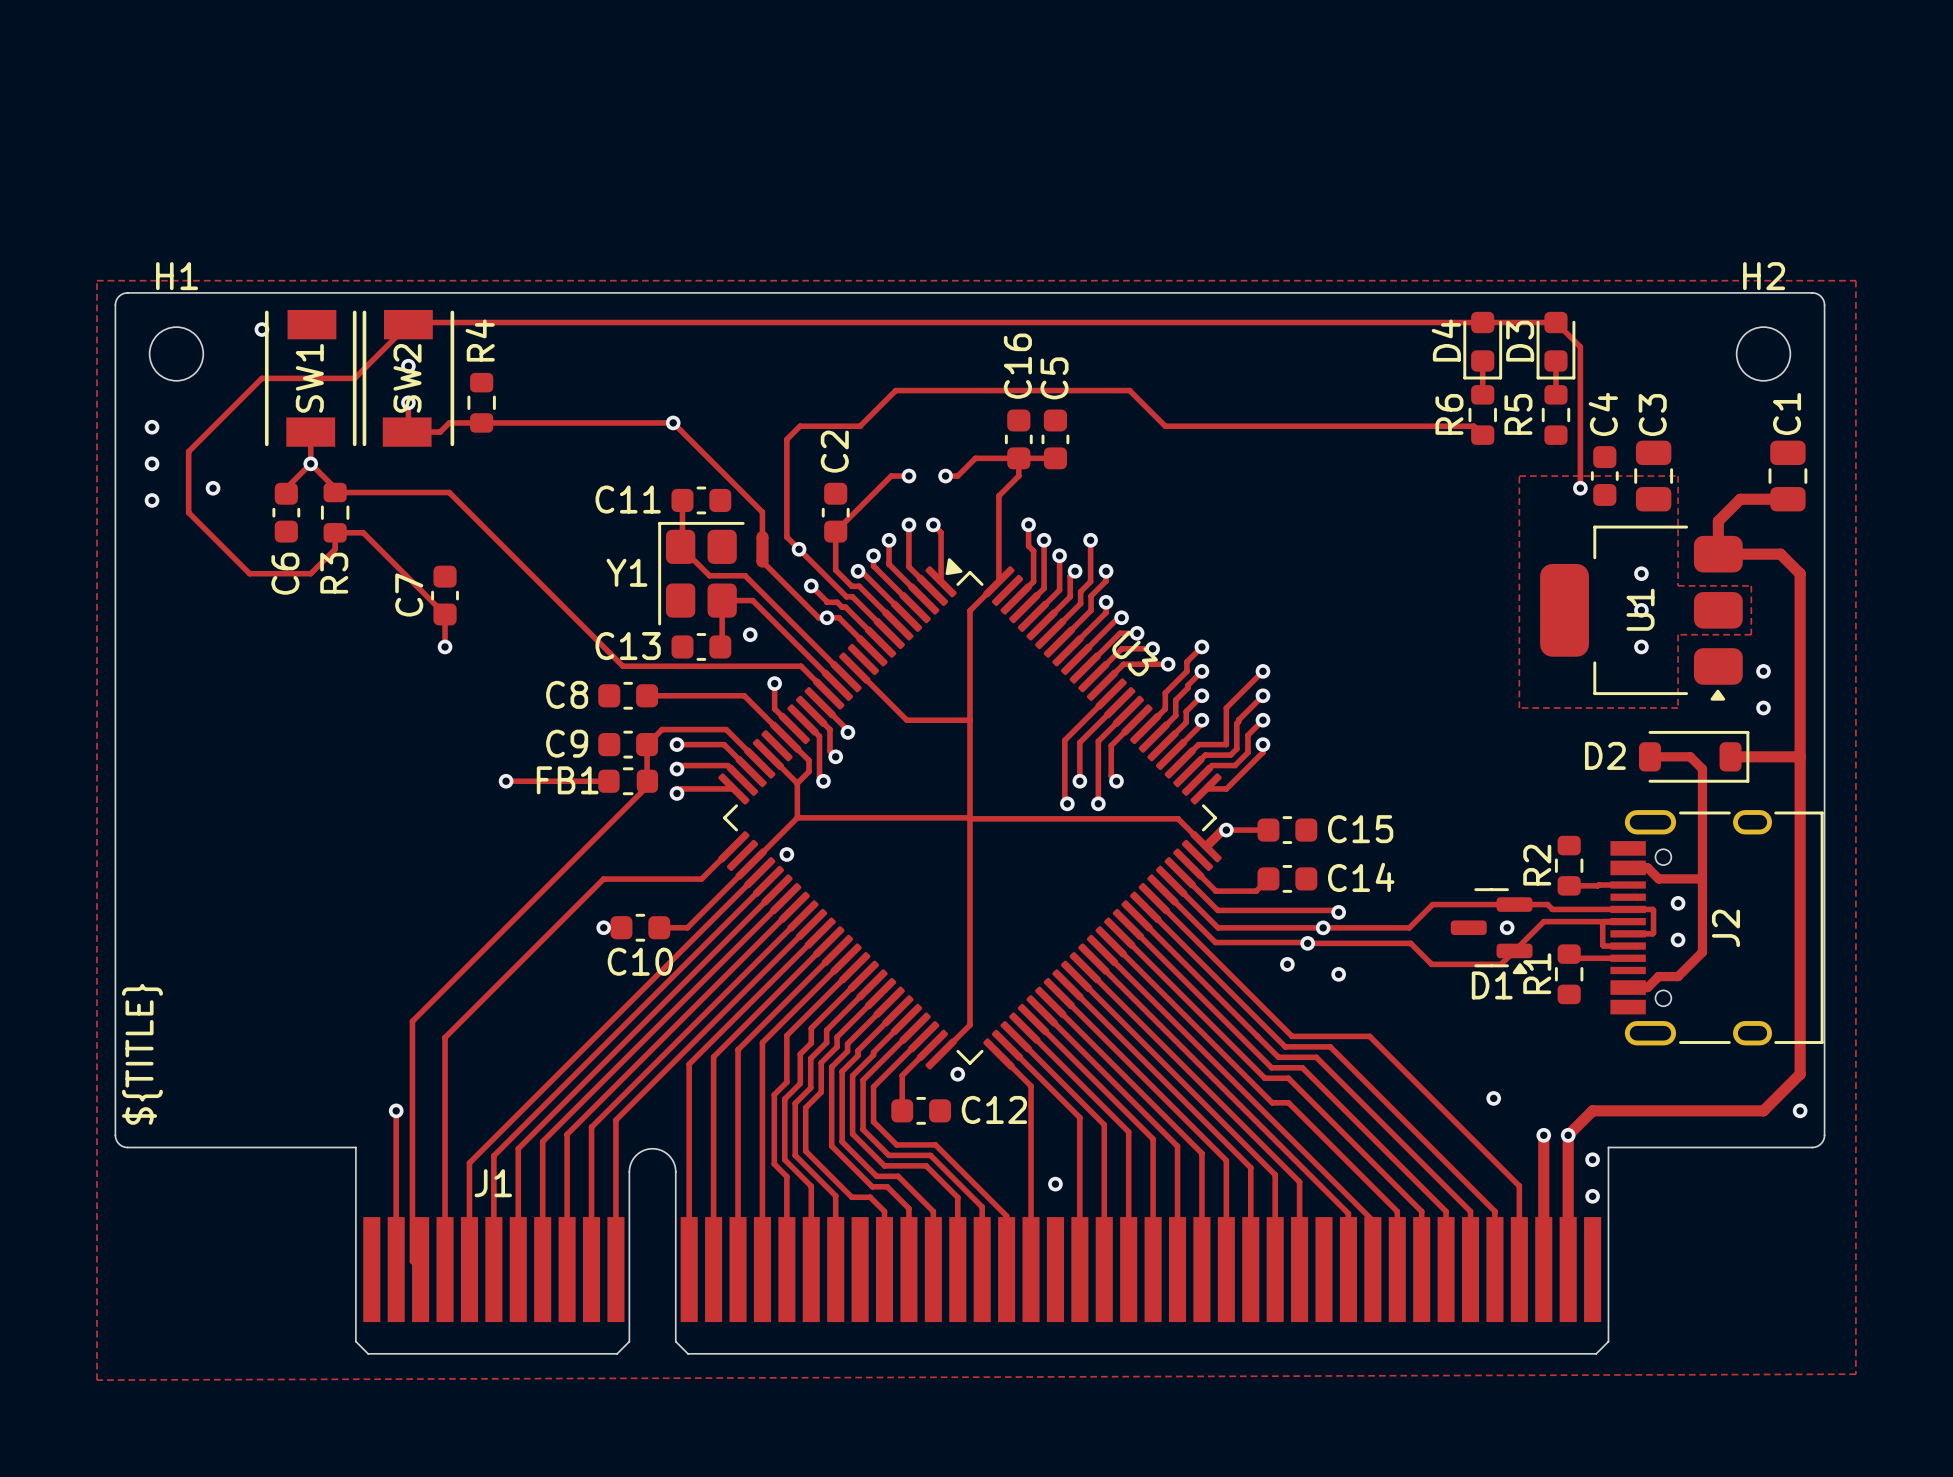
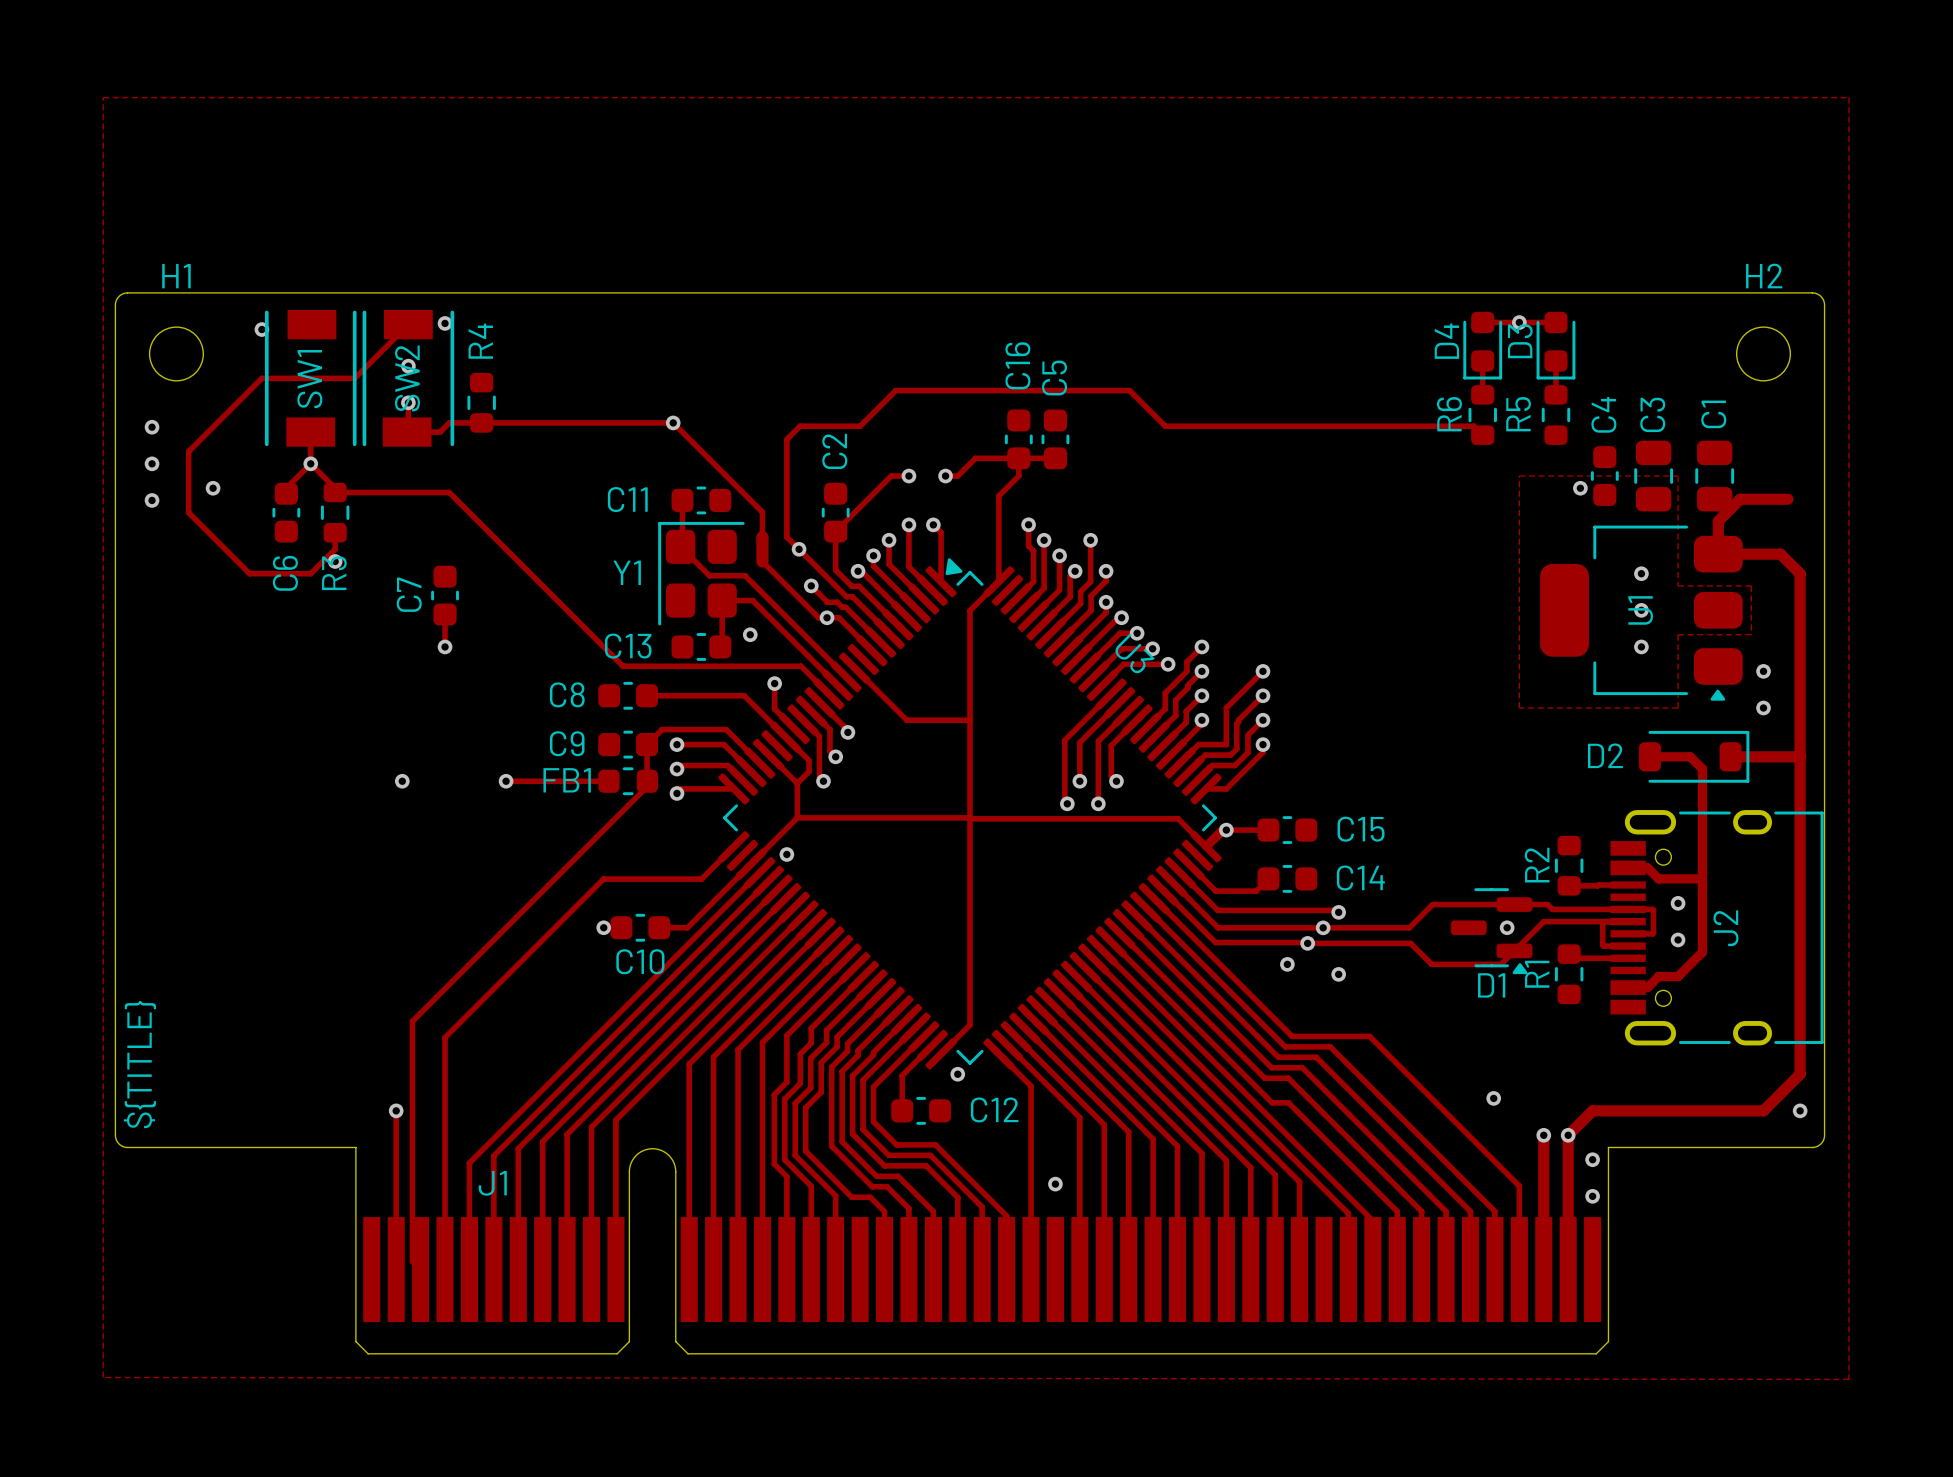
zone outline: (96, 280) (1855, 280) (1855, 1374) (96, 1380) (96, 280) -> (103, 97) (103, 1377) (1848, 1379) (1848, 97) (103, 97)
track: (410, 322) (1482, 322) -> none
via: none -> (1519, 322)
track: (1555, 322) (1580, 346) (1580, 488) -> none
via: none -> (445, 323)
C1 position: (1787, 476) -> (1714, 476)
track: (335, 532) (363, 532) (445, 614) -> none
via: none -> (335, 561)
via: none -> (402, 781)

